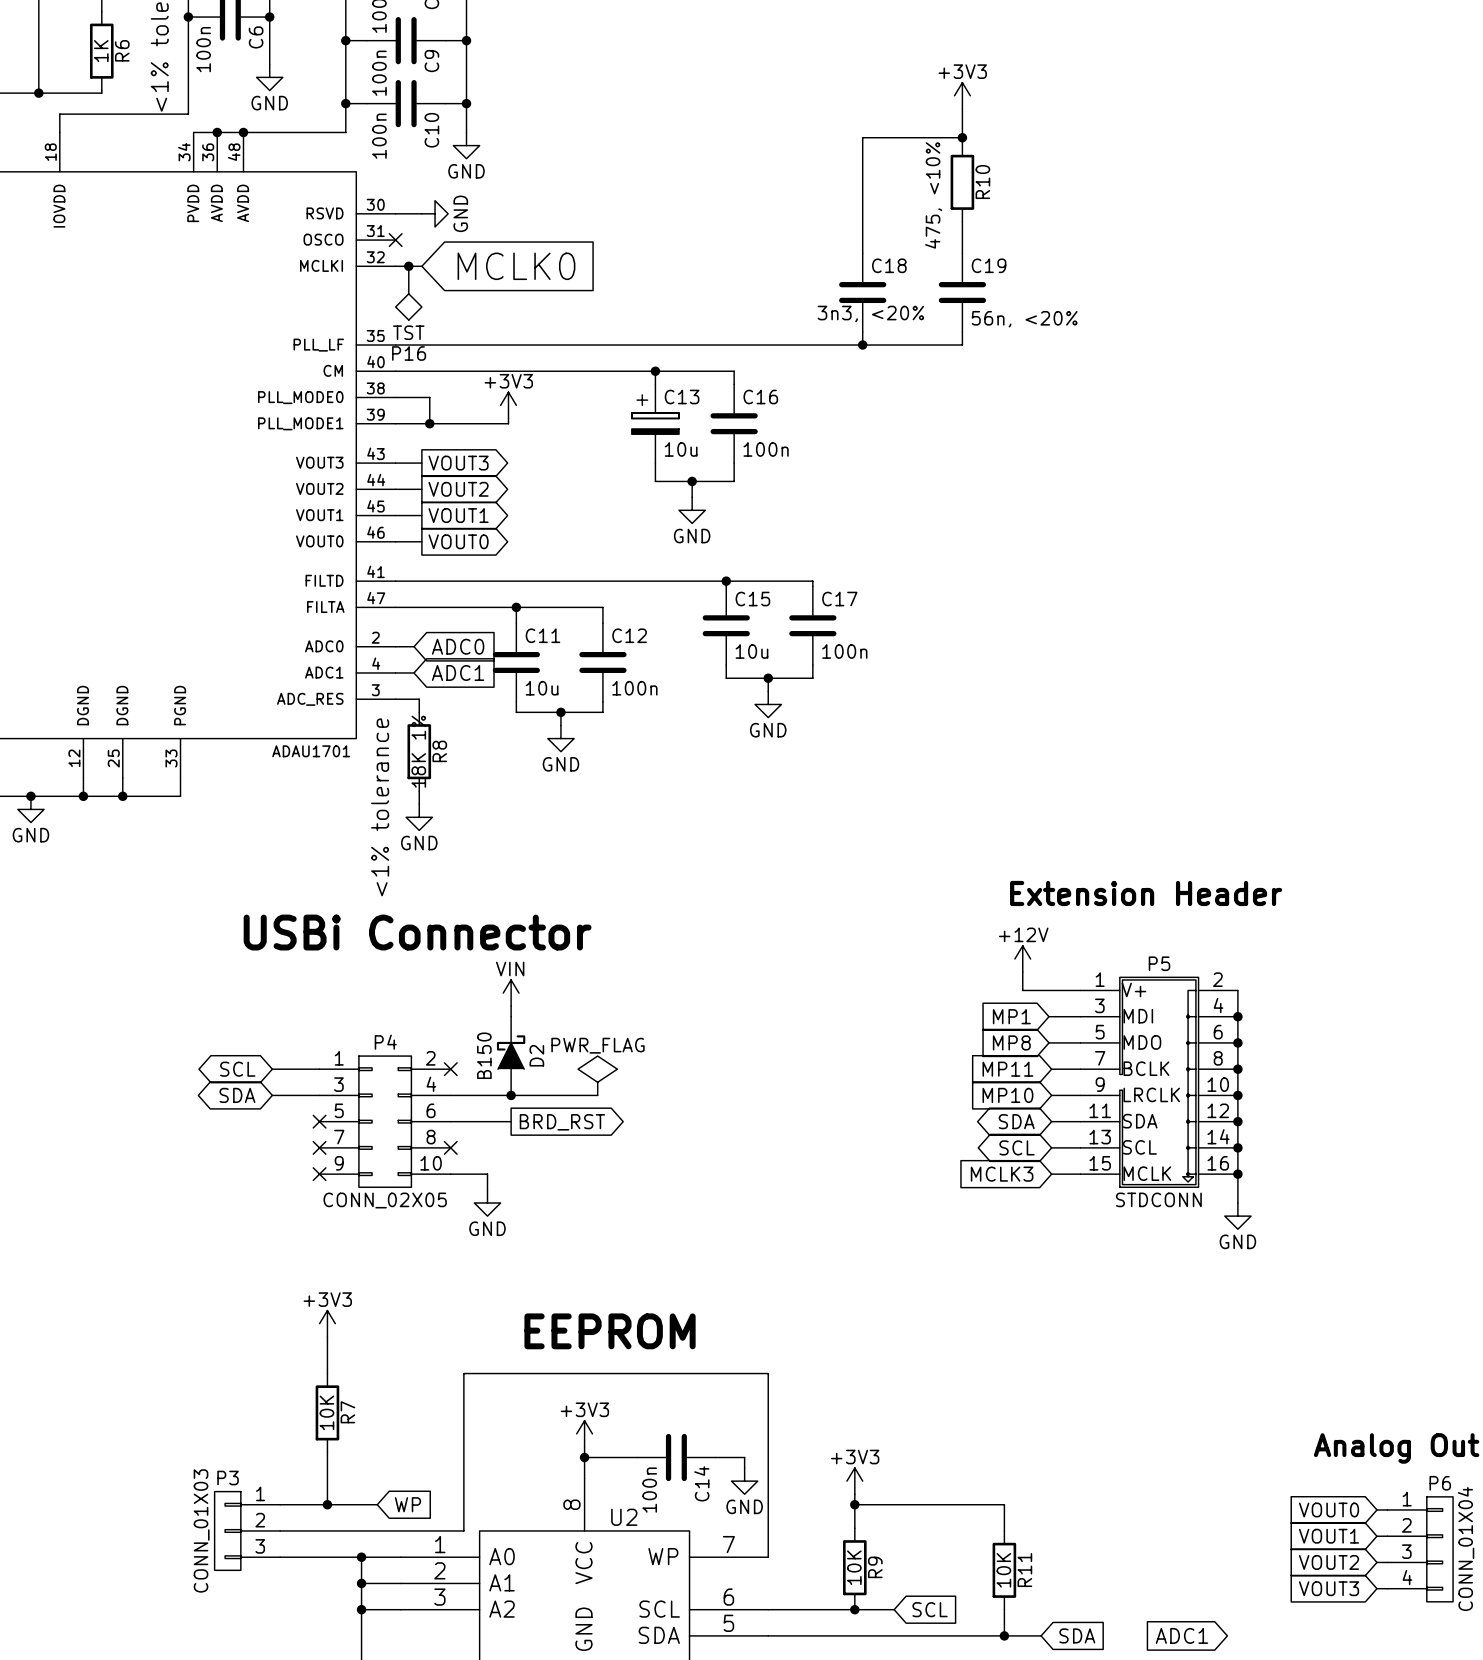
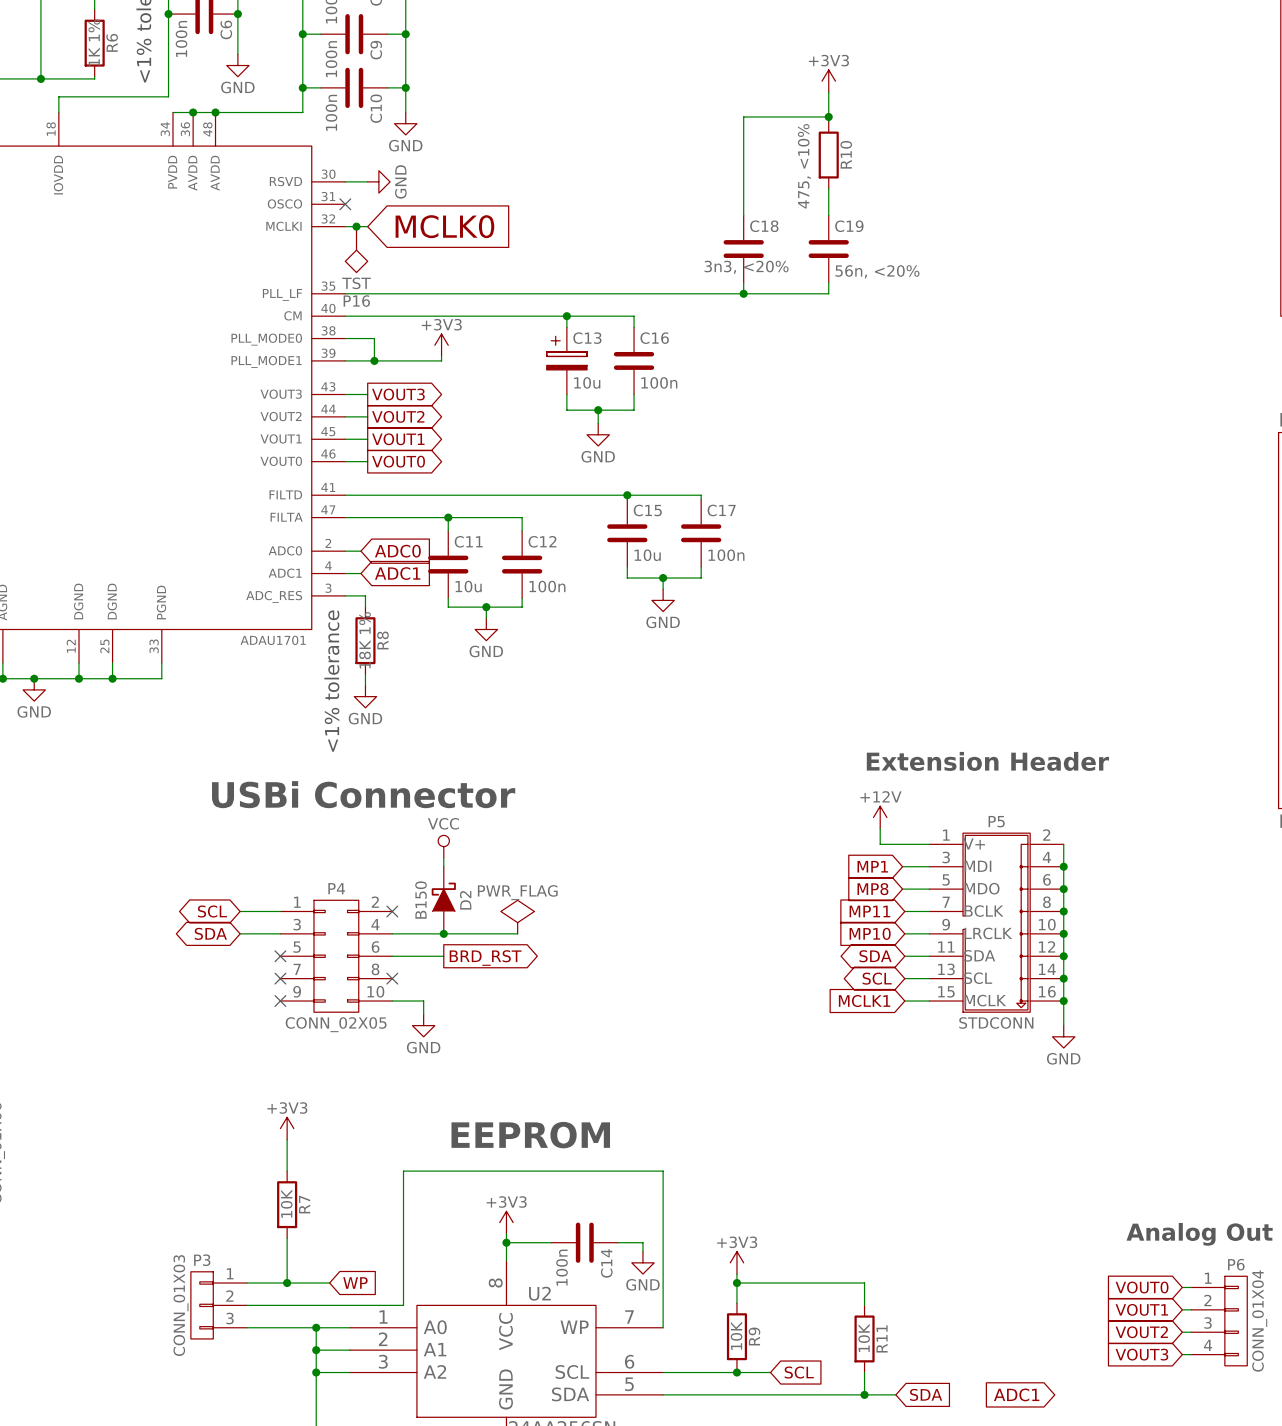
R6 value: 1K (101, 51) -> 1K 1% (94, 42)
power symbol: VIN (511, 993) -> VCC (443, 846)
global label: MCLK3 (1002, 1174) -> MCLK1 (864, 1001)

